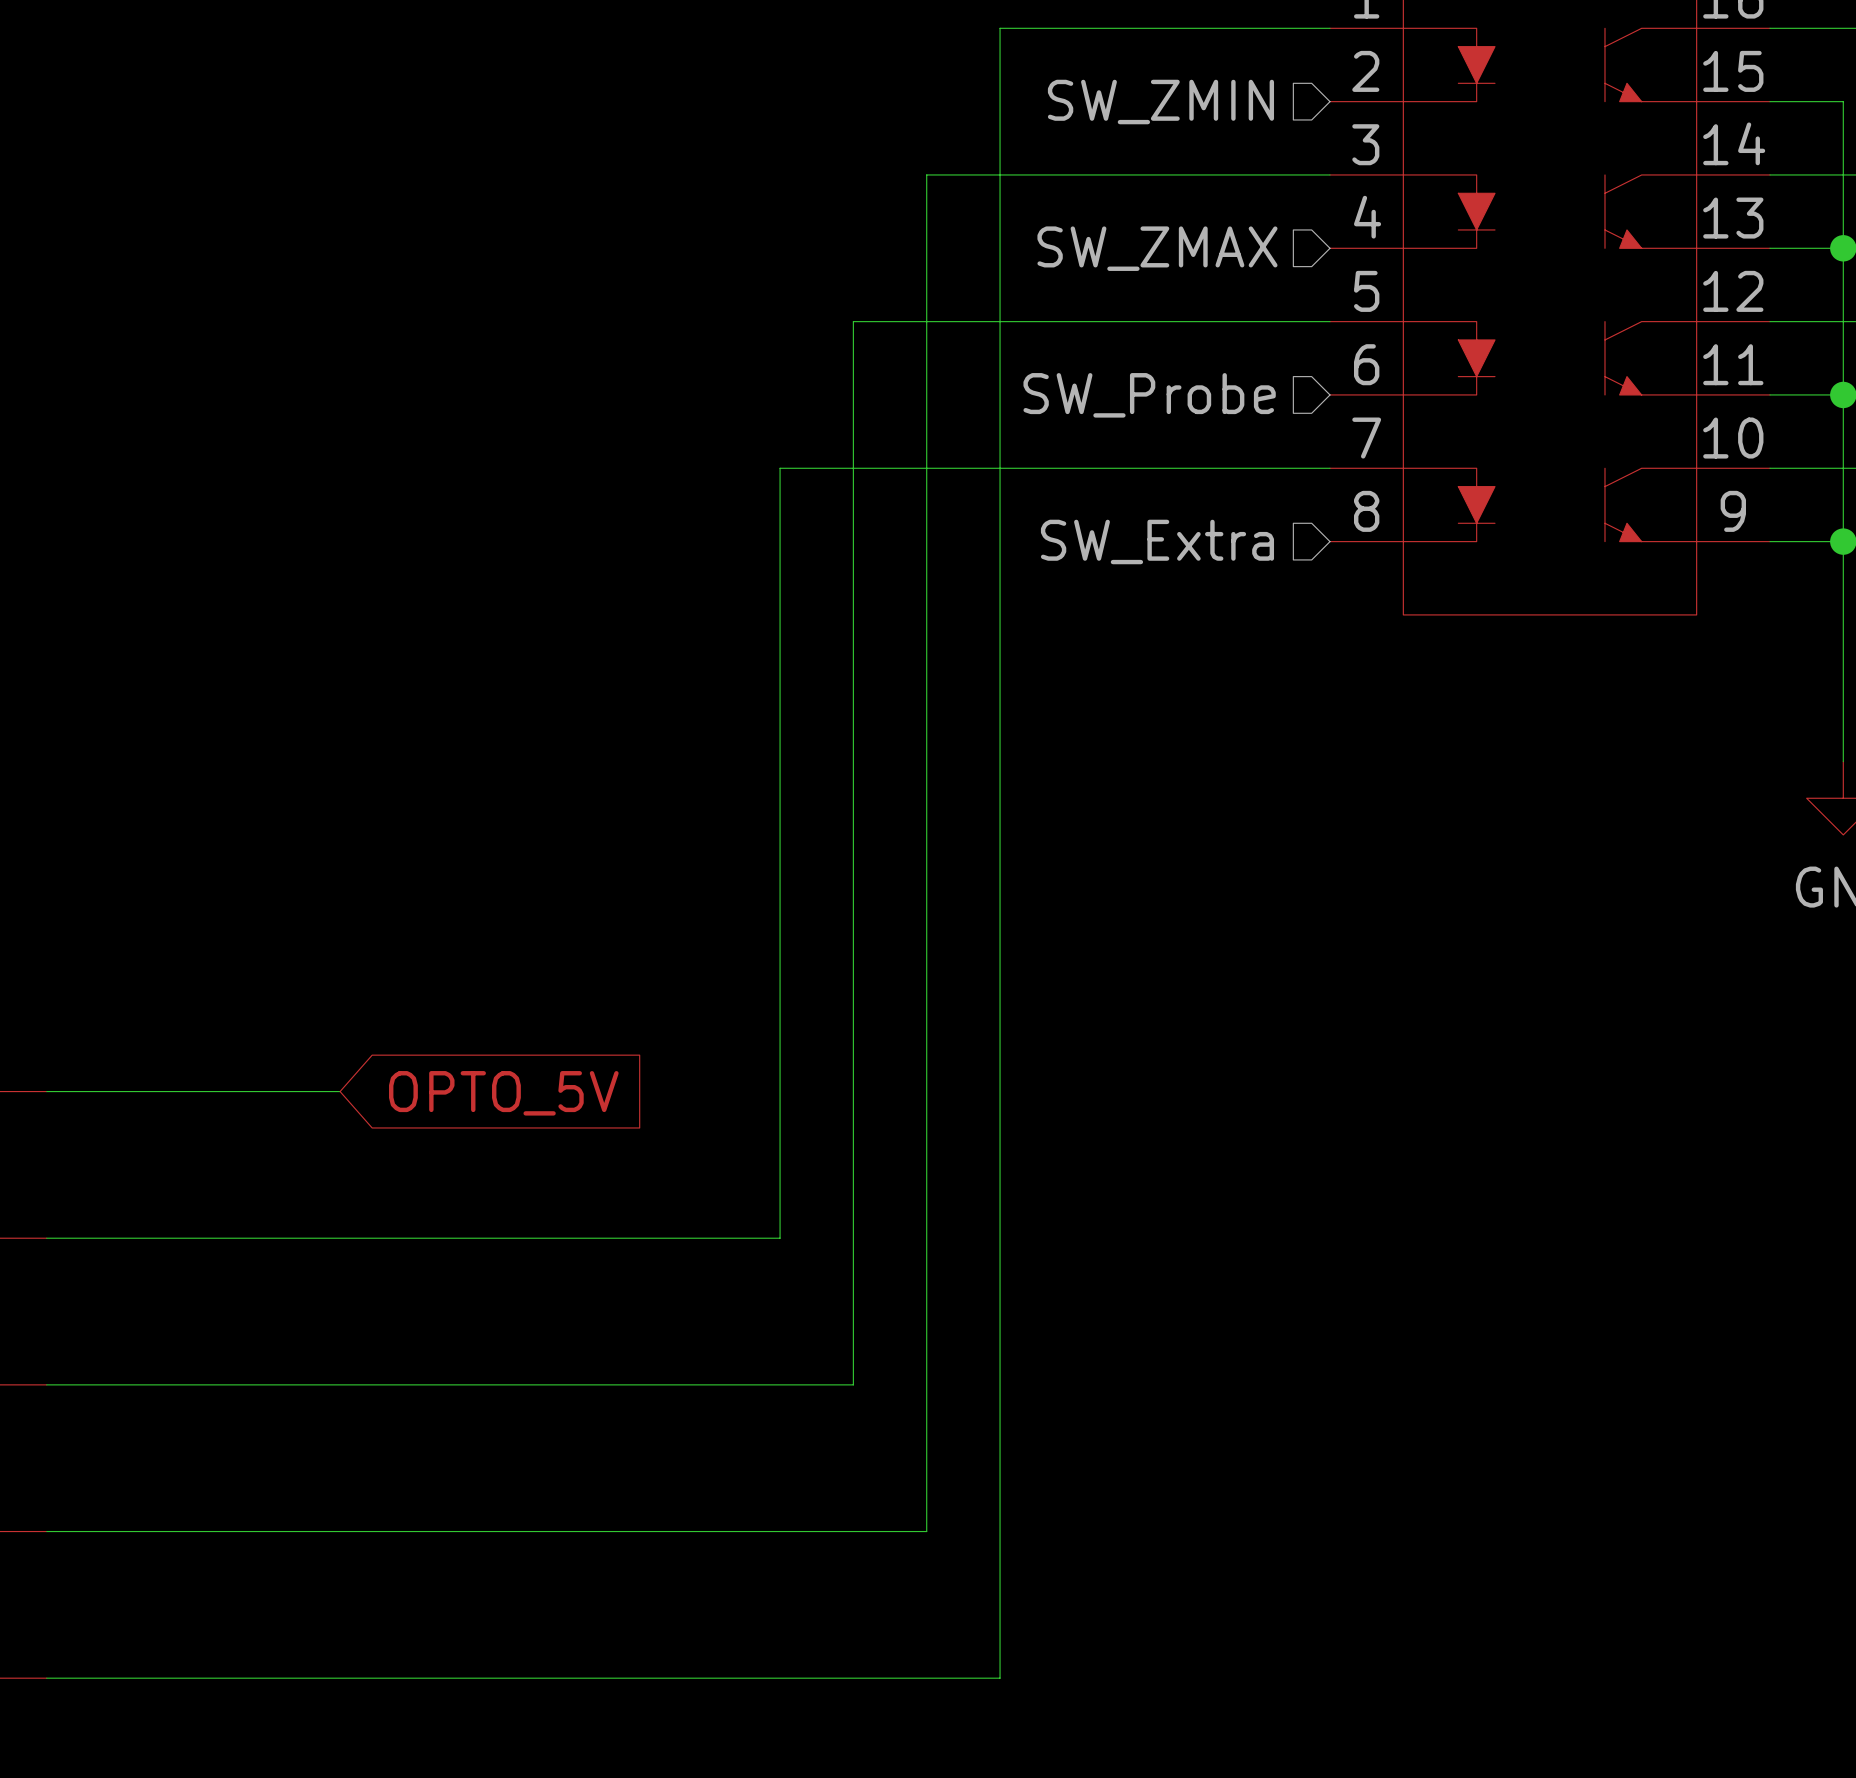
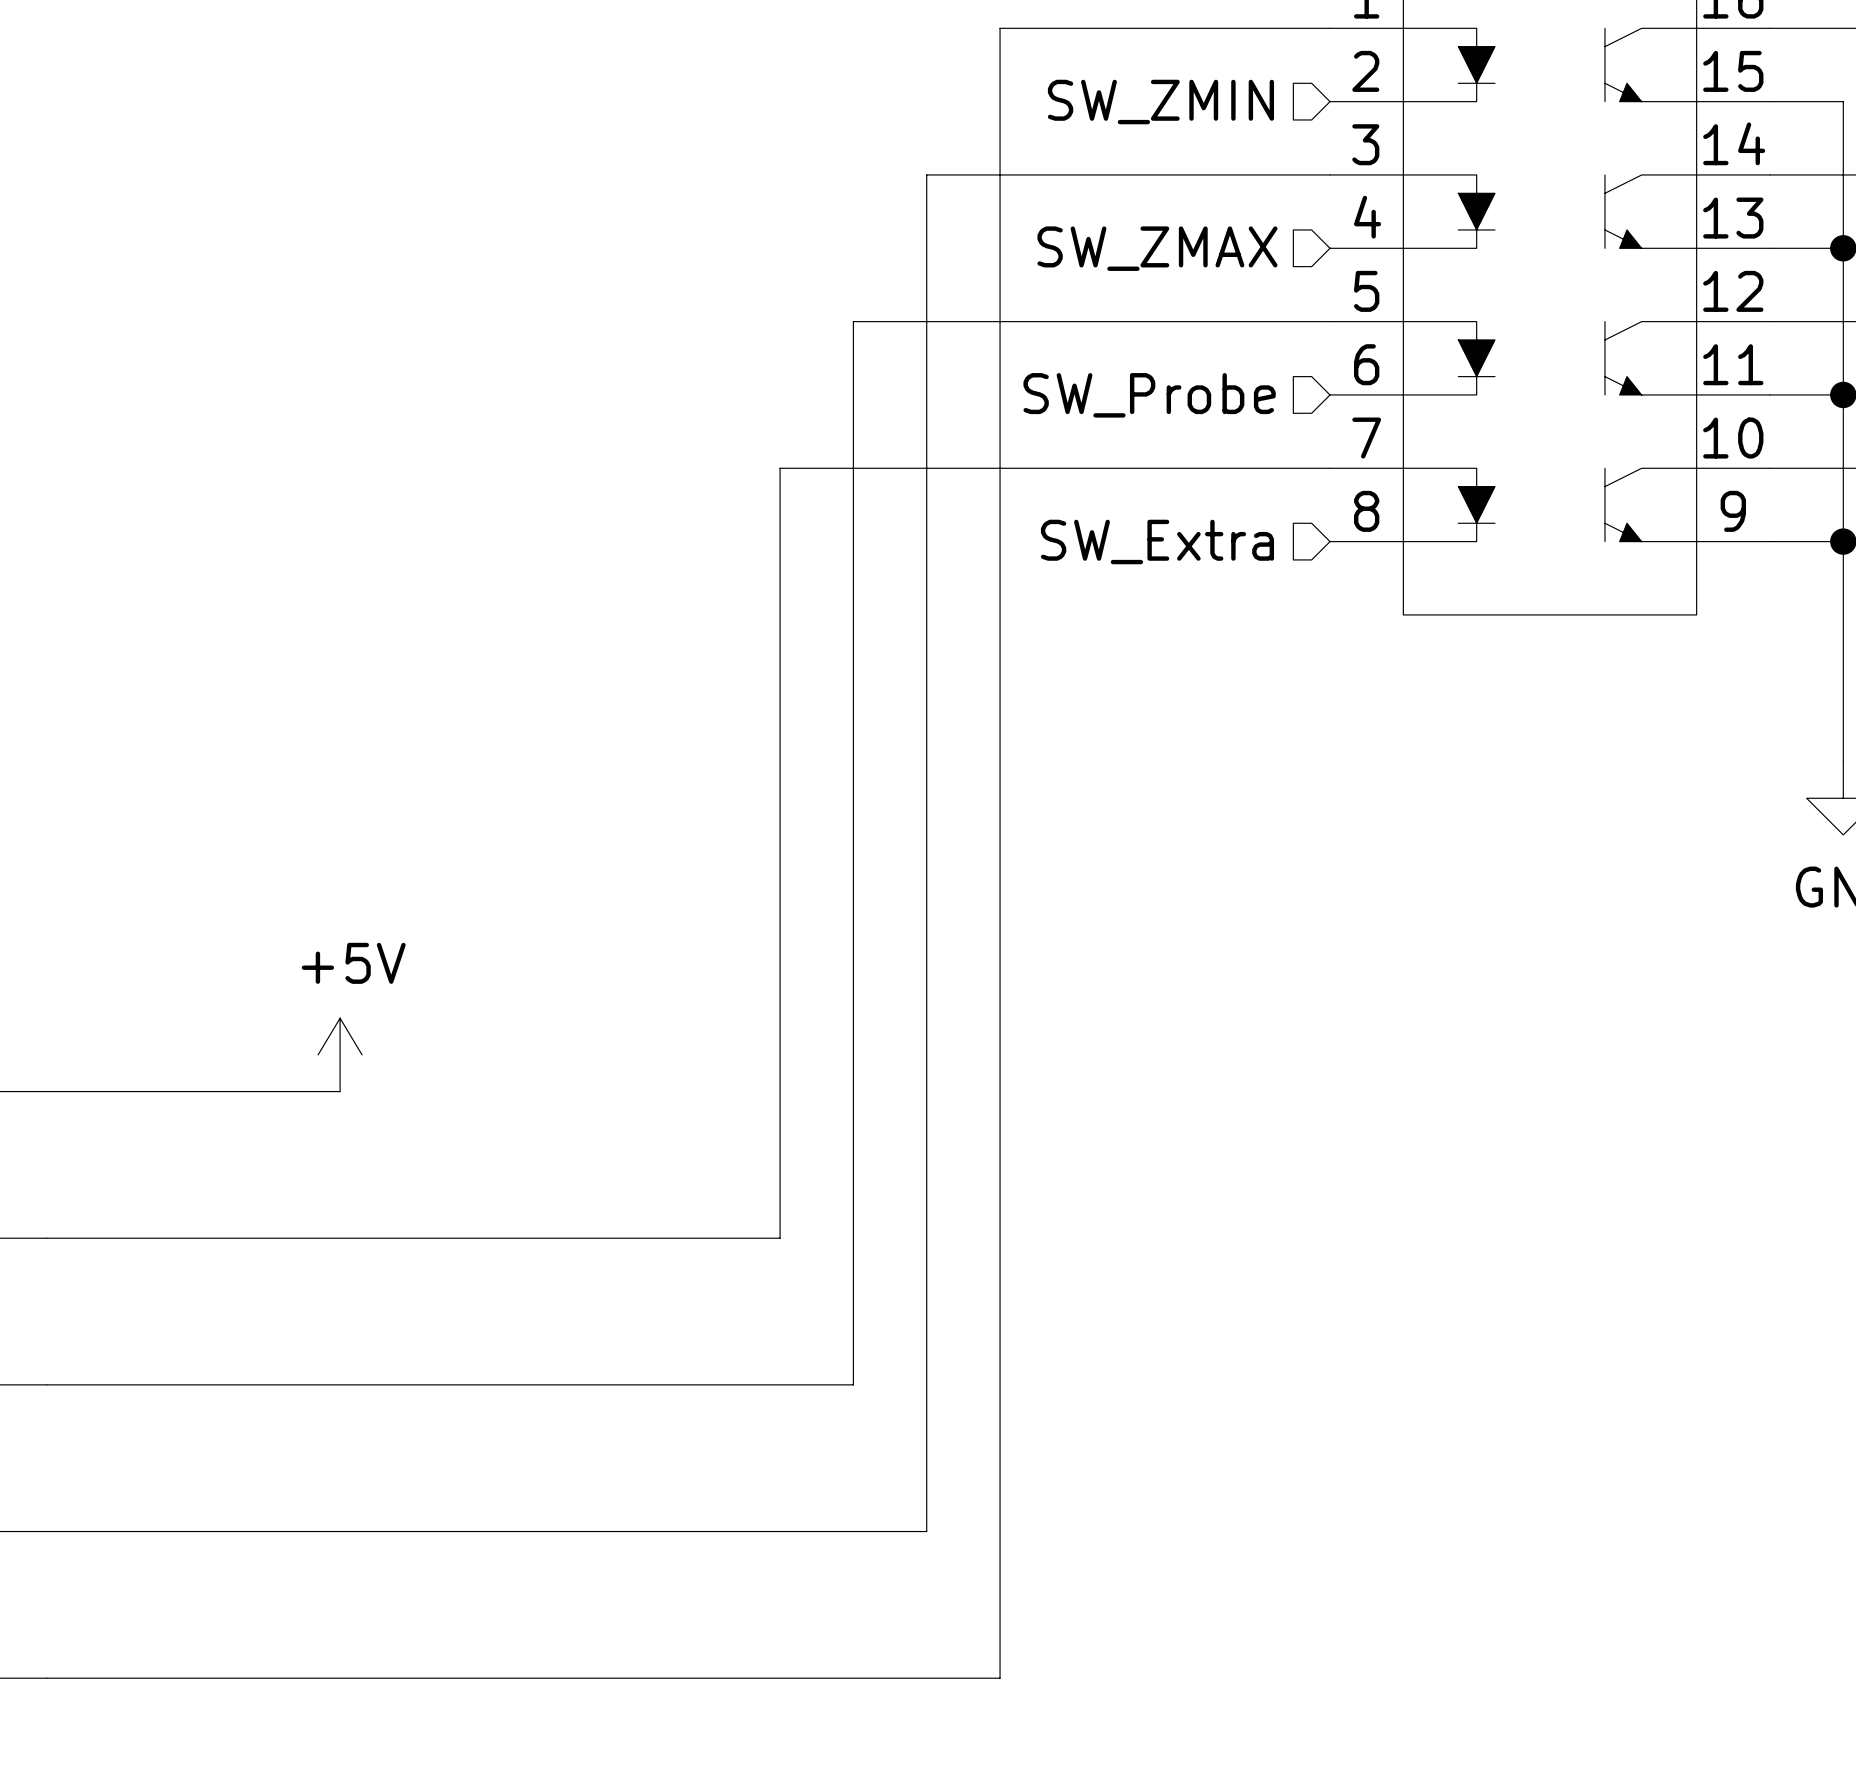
power symbol: none -> +5V (340, 1054)
global label: OPTO_5V (503, 1093) -> none

